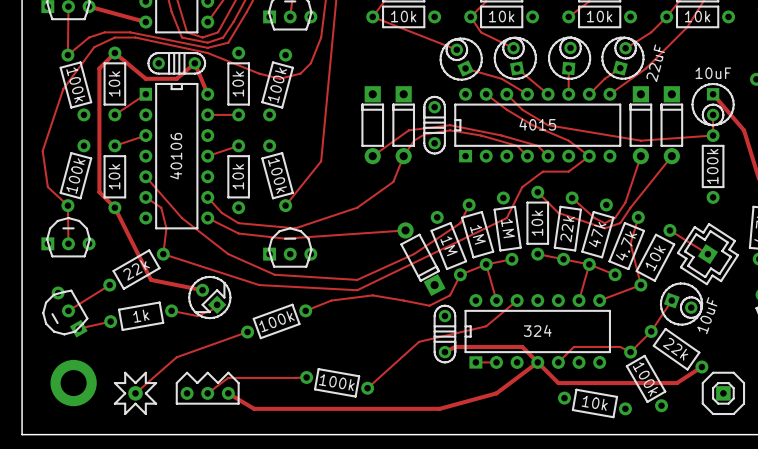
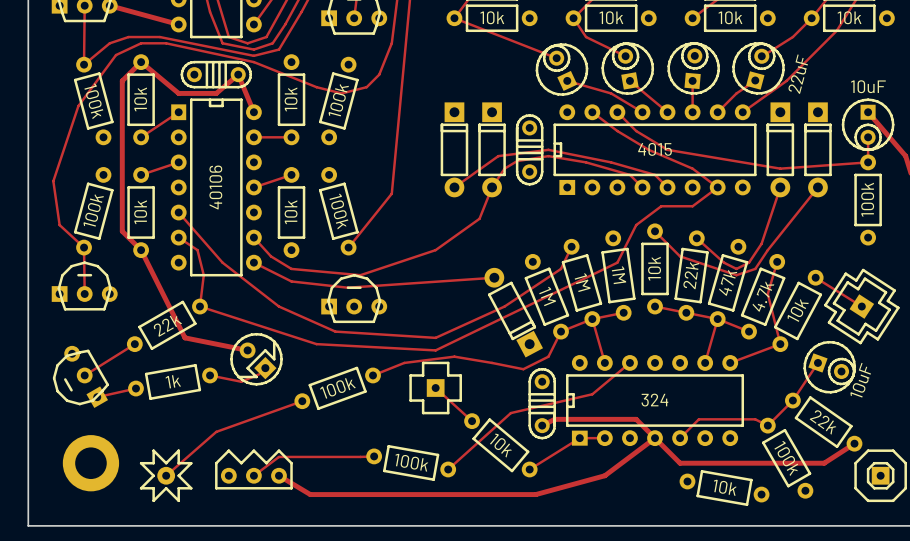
track: none -> (435, 388) (472, 421)
part: none -> (435, 388)
track: none -> (579, 438) (529, 469)
part: none -> 10k (500, 445)

